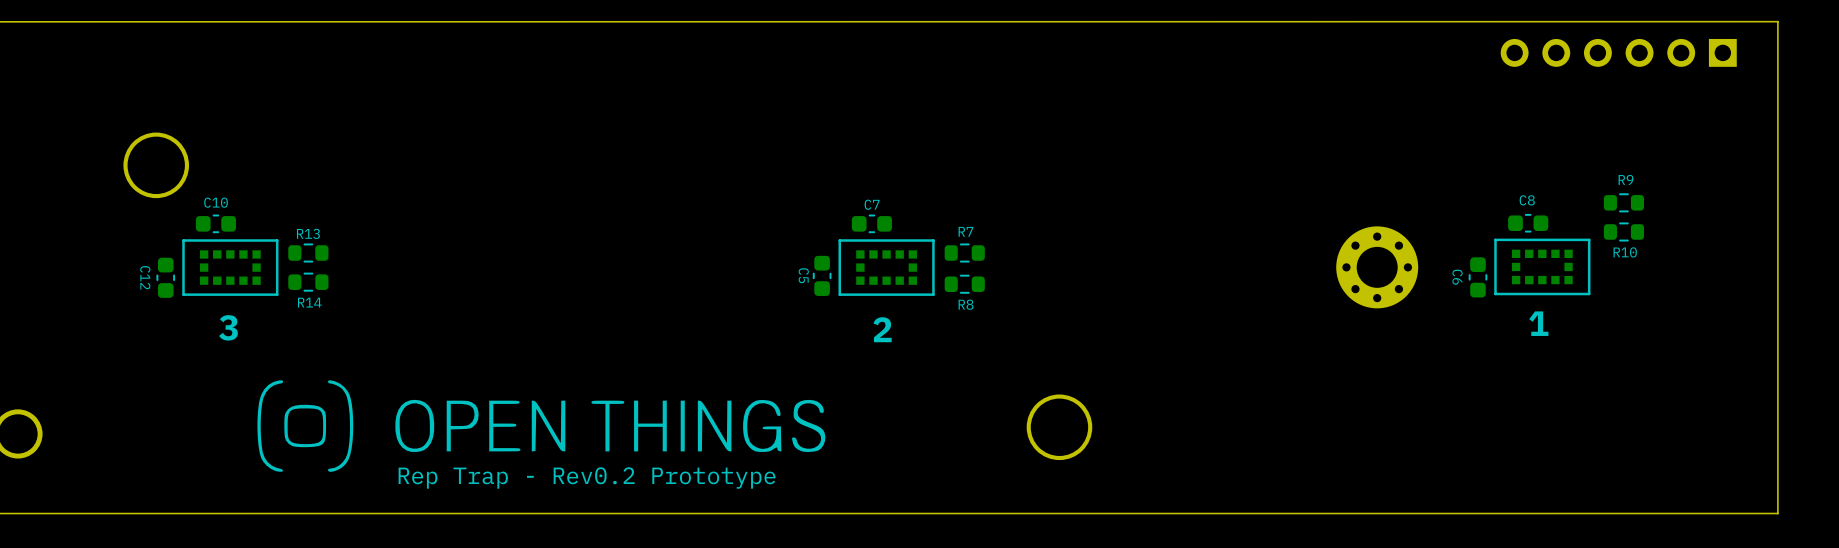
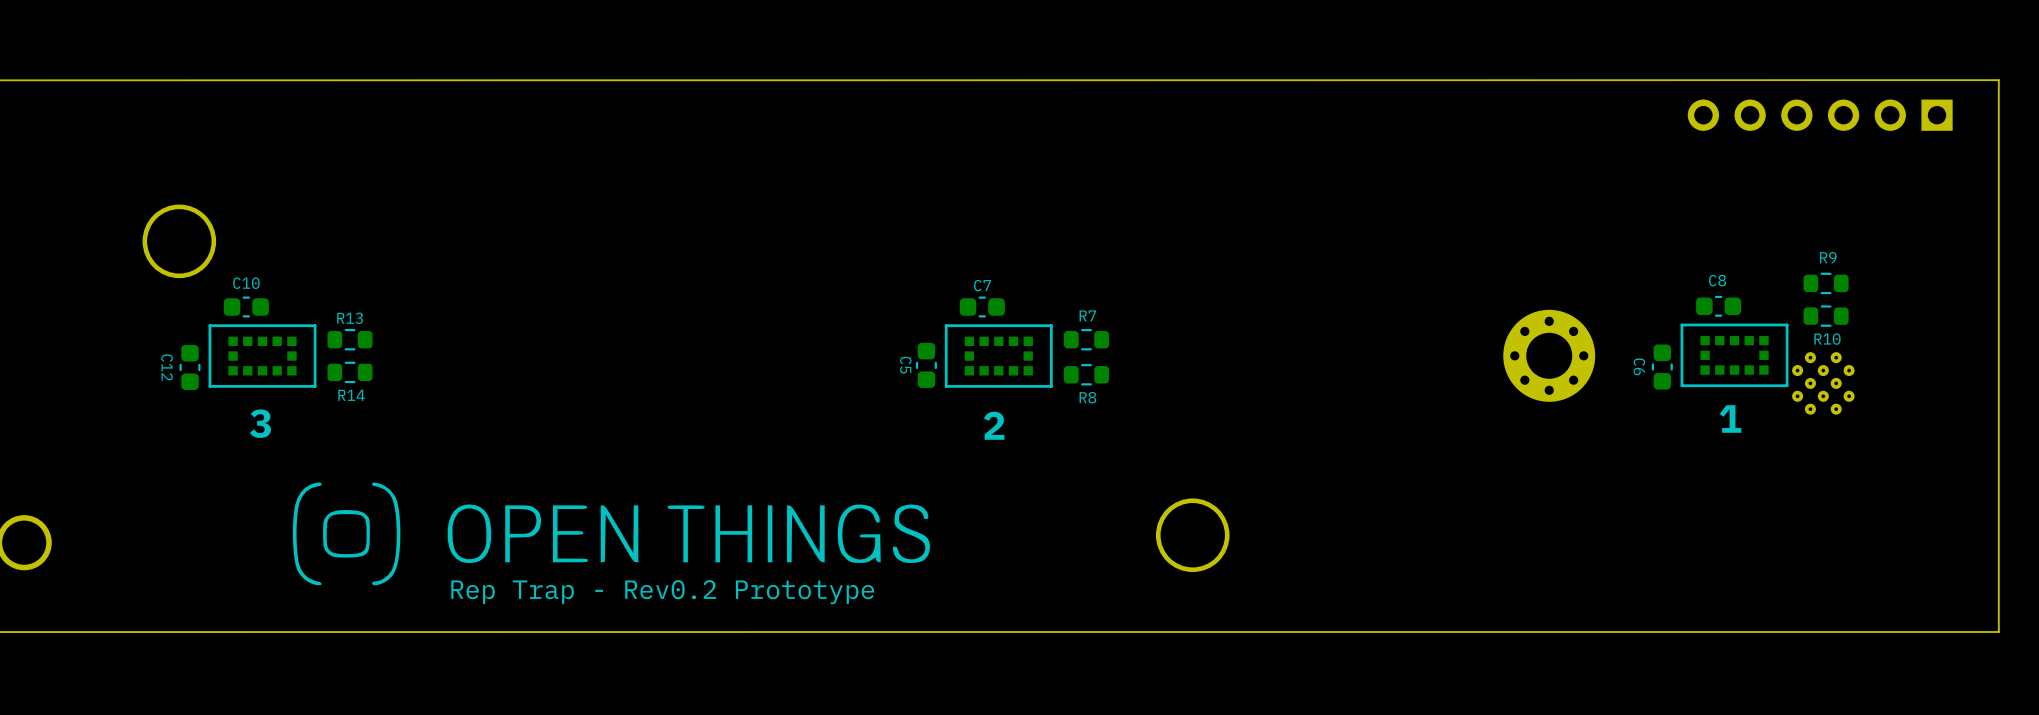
part: none -> (1823, 383)

